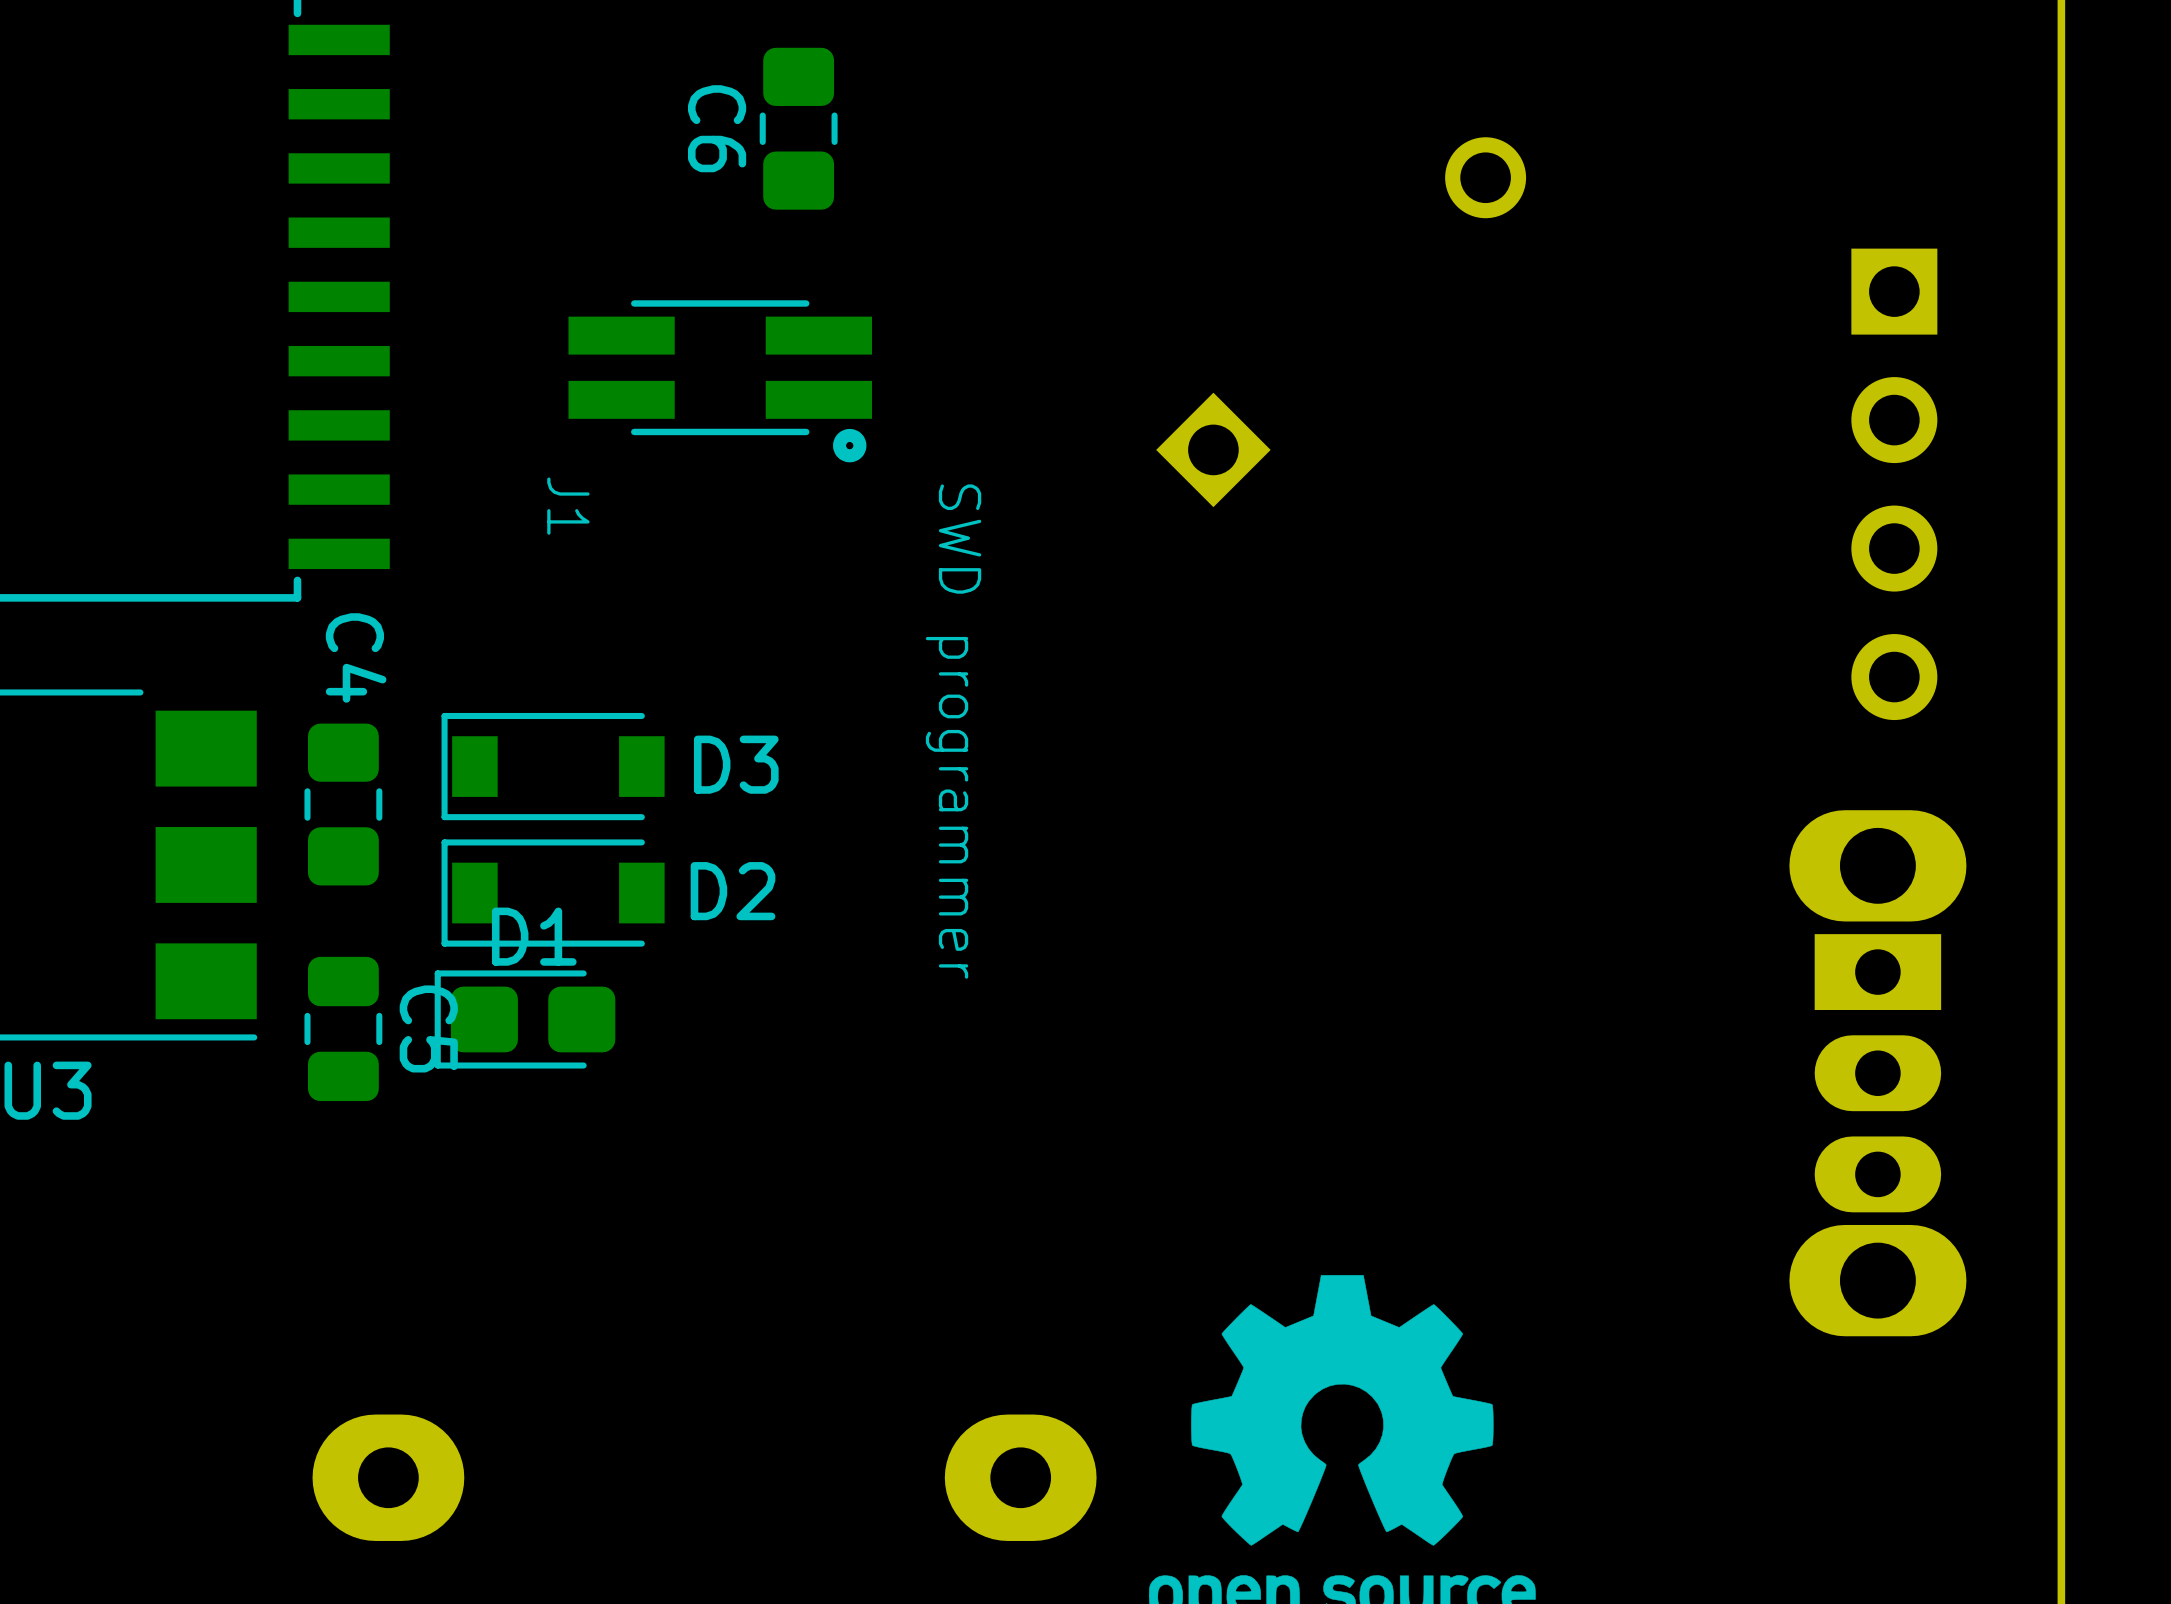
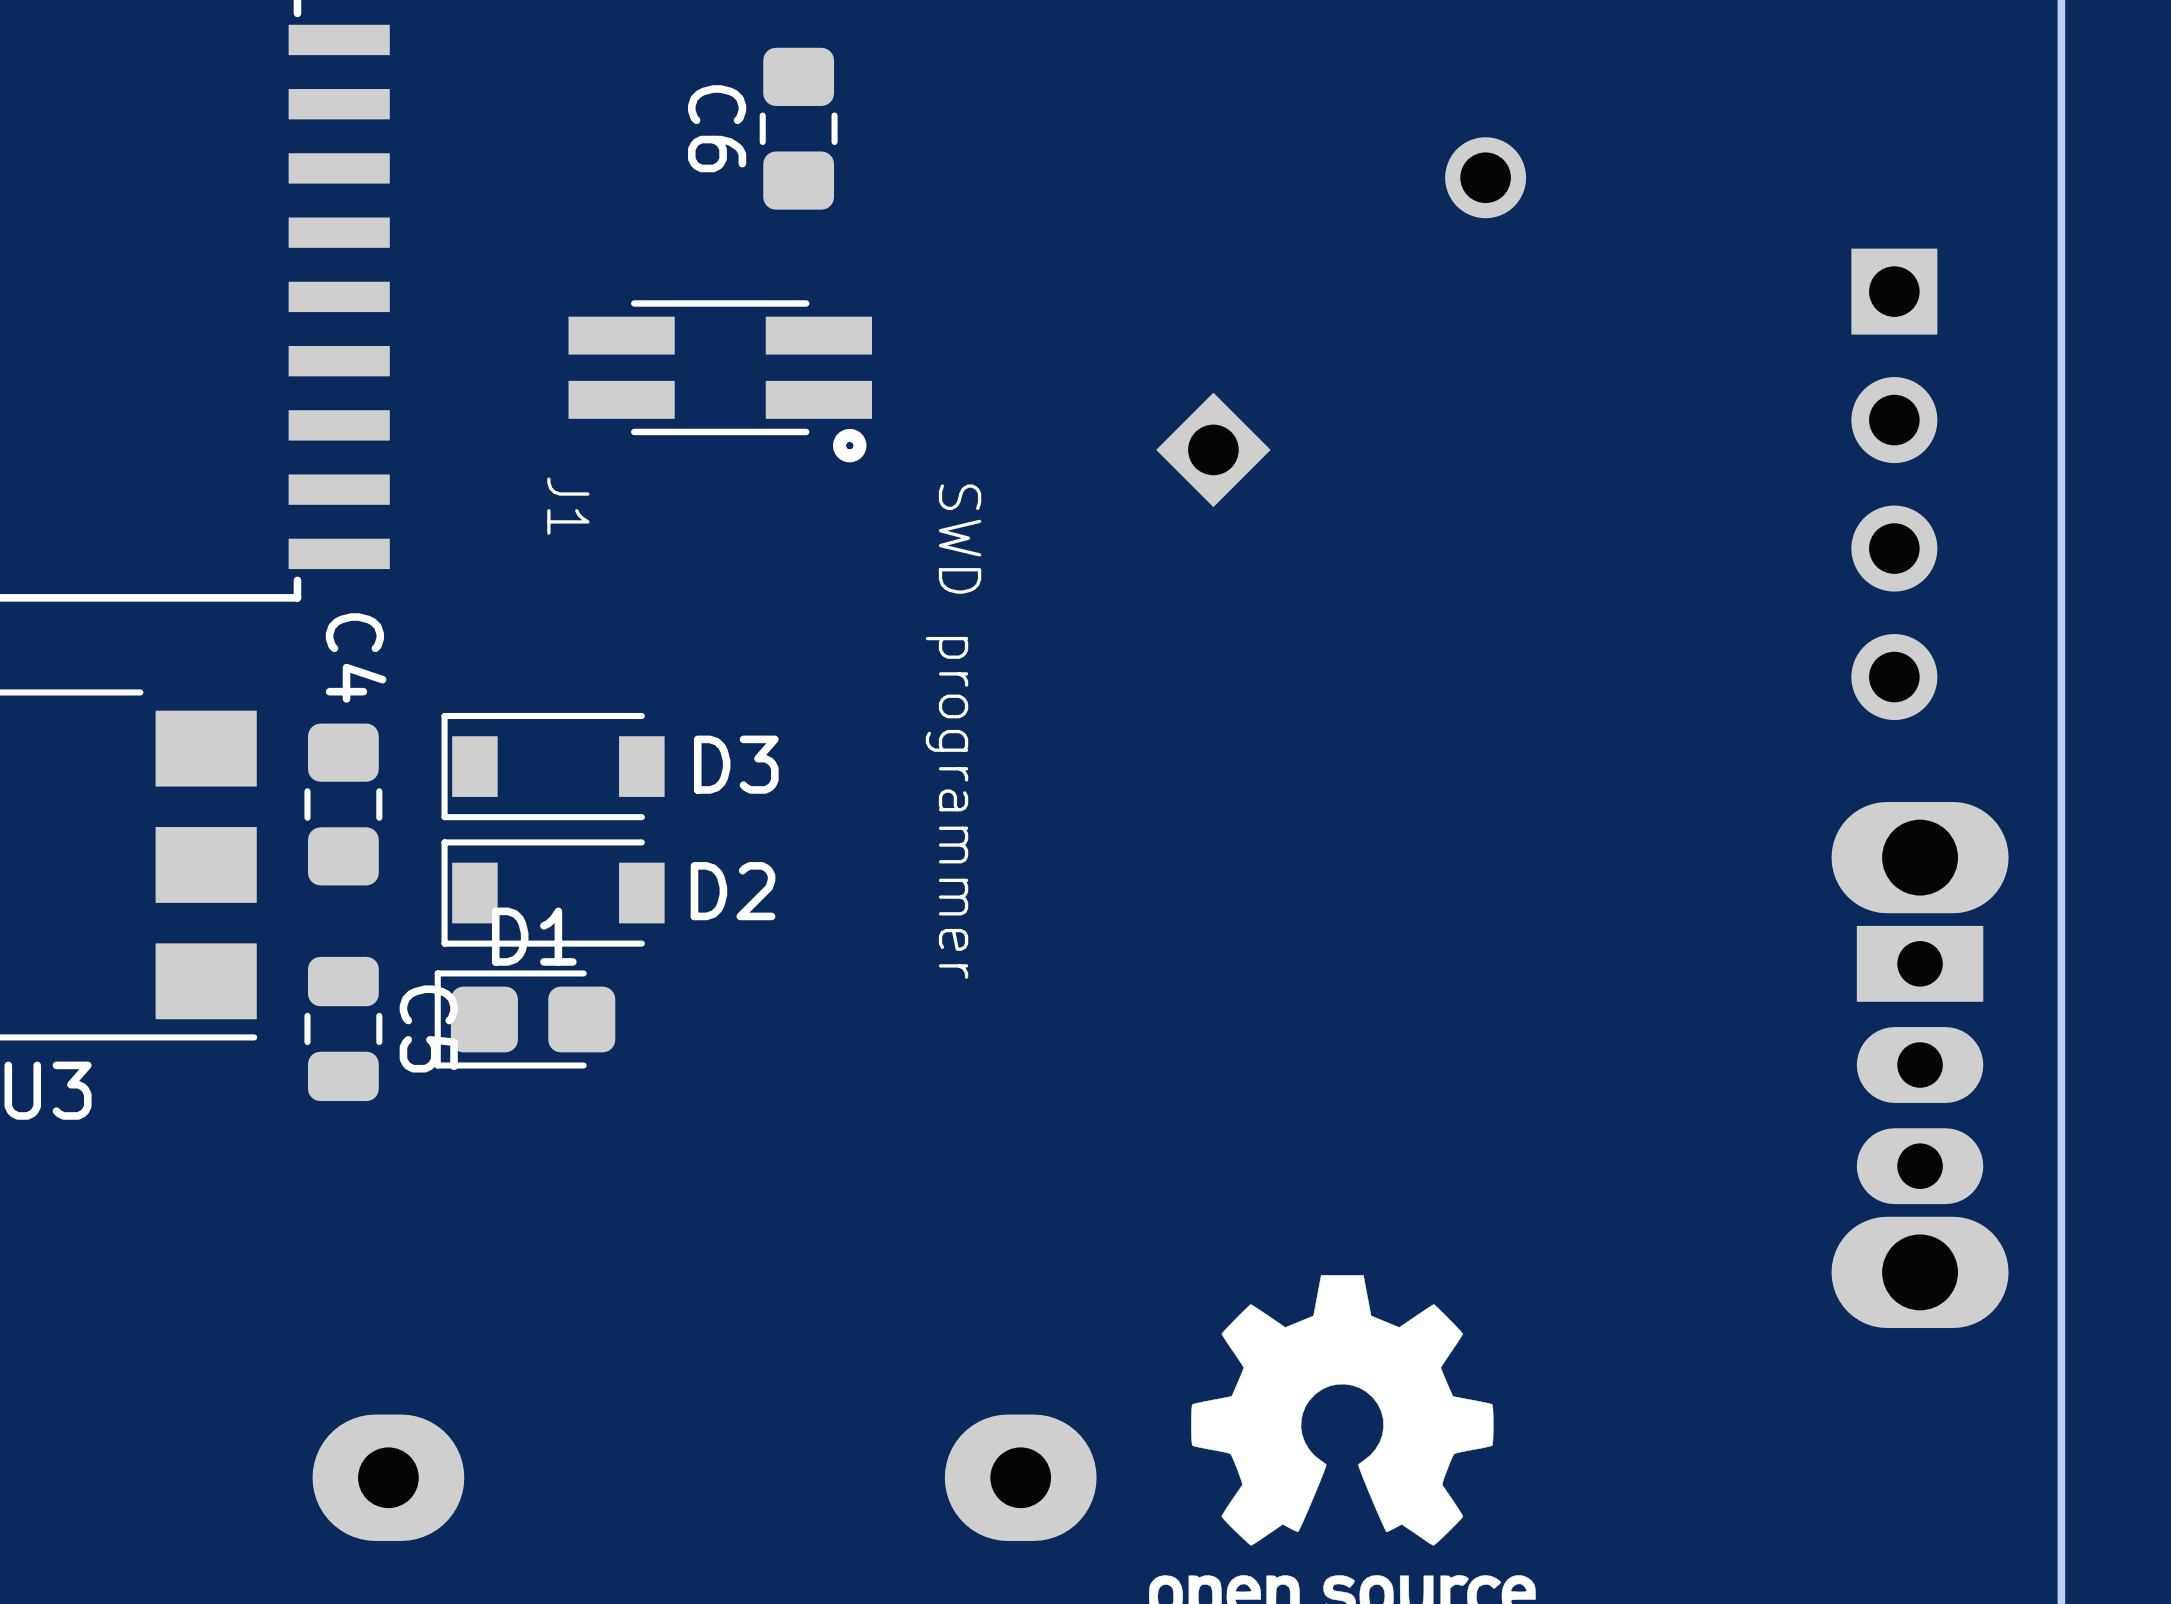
part position: (1877, 1073) -> (1920, 1065)

